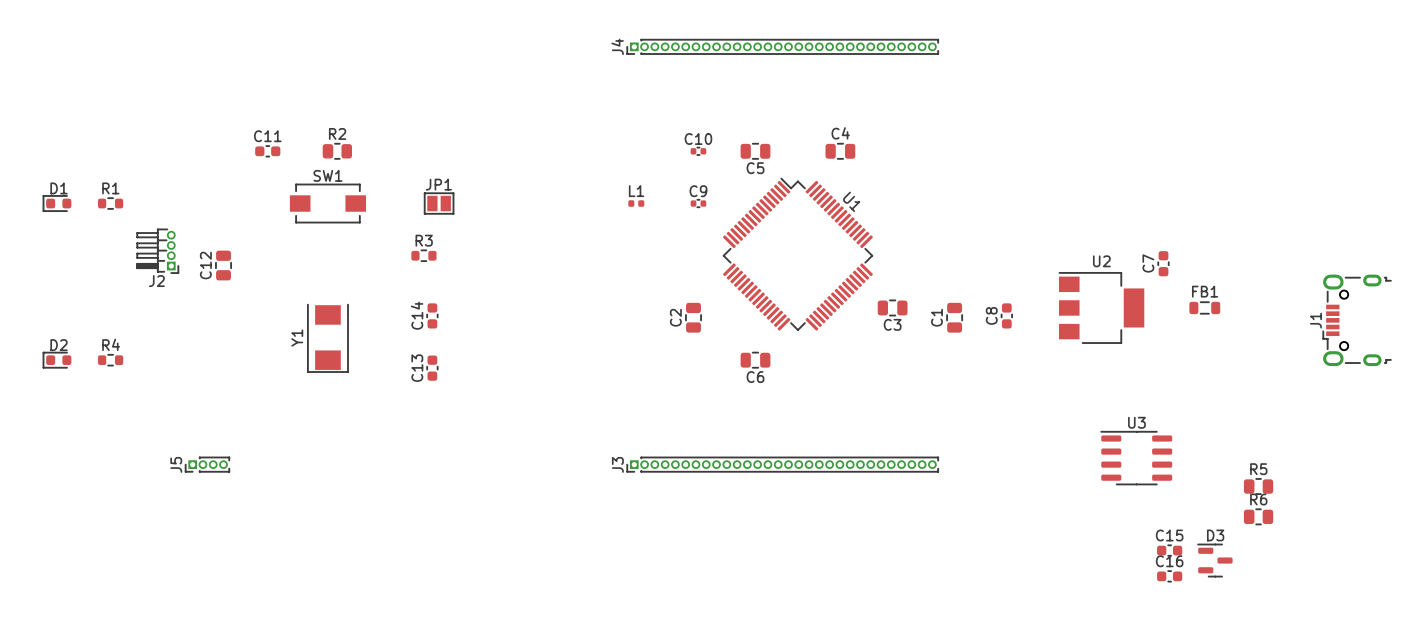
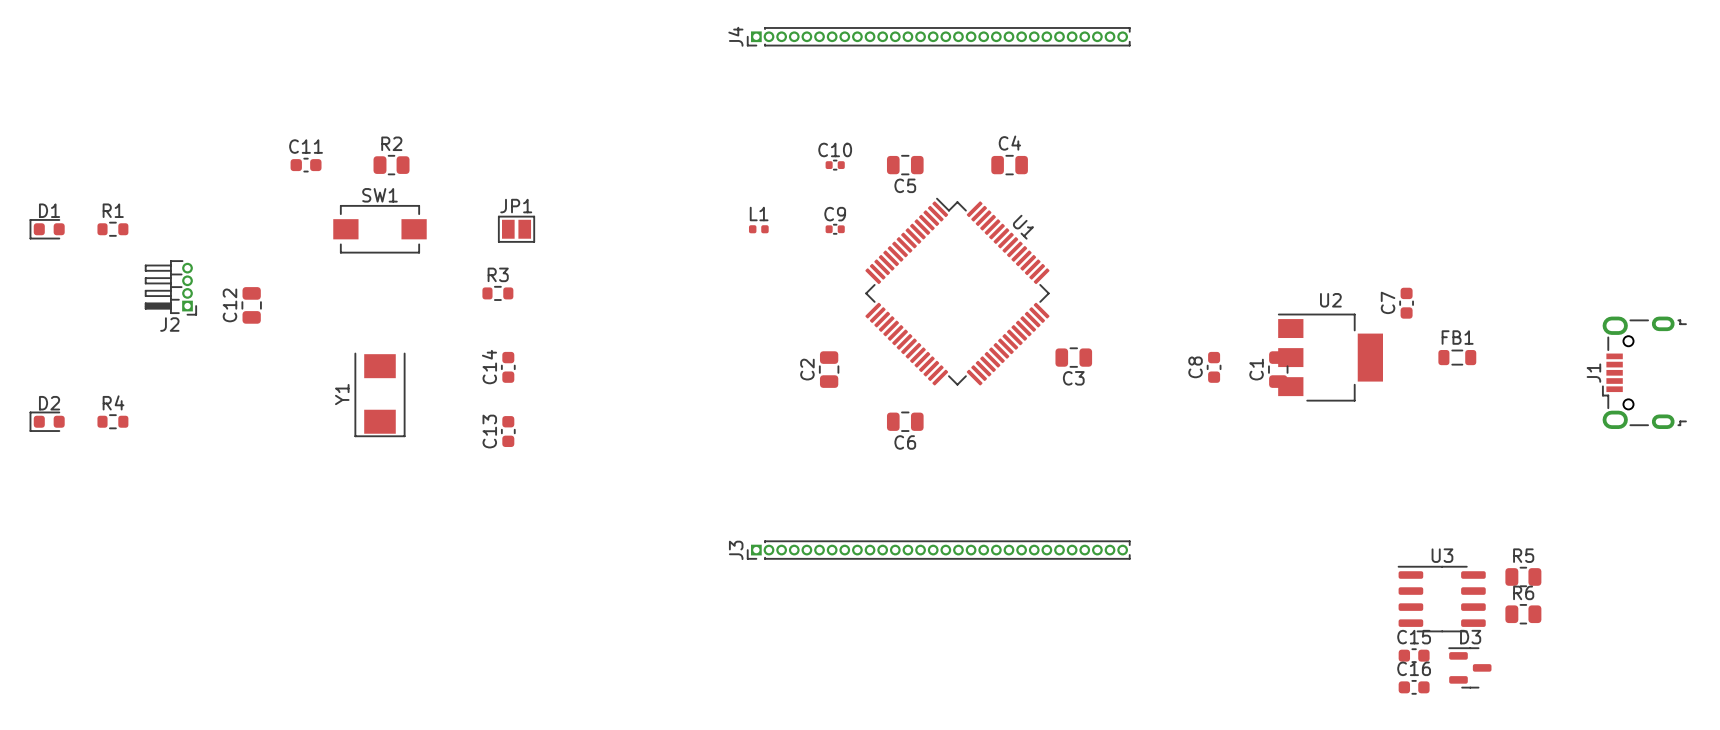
C1 position: (954, 317) -> (1278, 369)
U3 position: (1136, 458) -> (1441, 599)
J5: (207, 464) -> none

